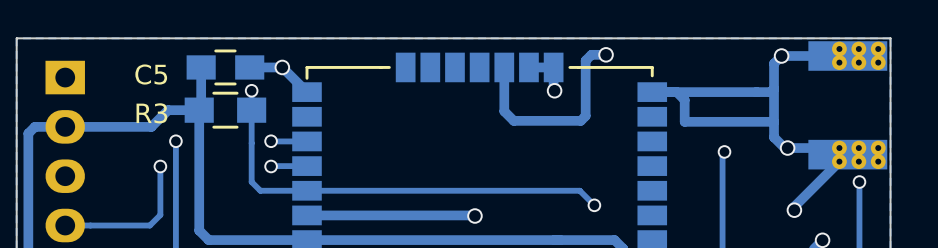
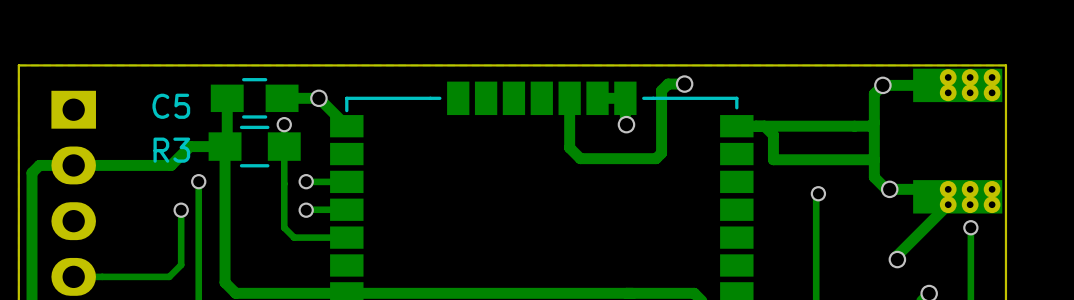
track: (307, 190) (579, 190) (594, 205) -> none
via: (594, 205) -> none
track: (307, 215) (474, 216) -> none
via: (474, 216) -> none

